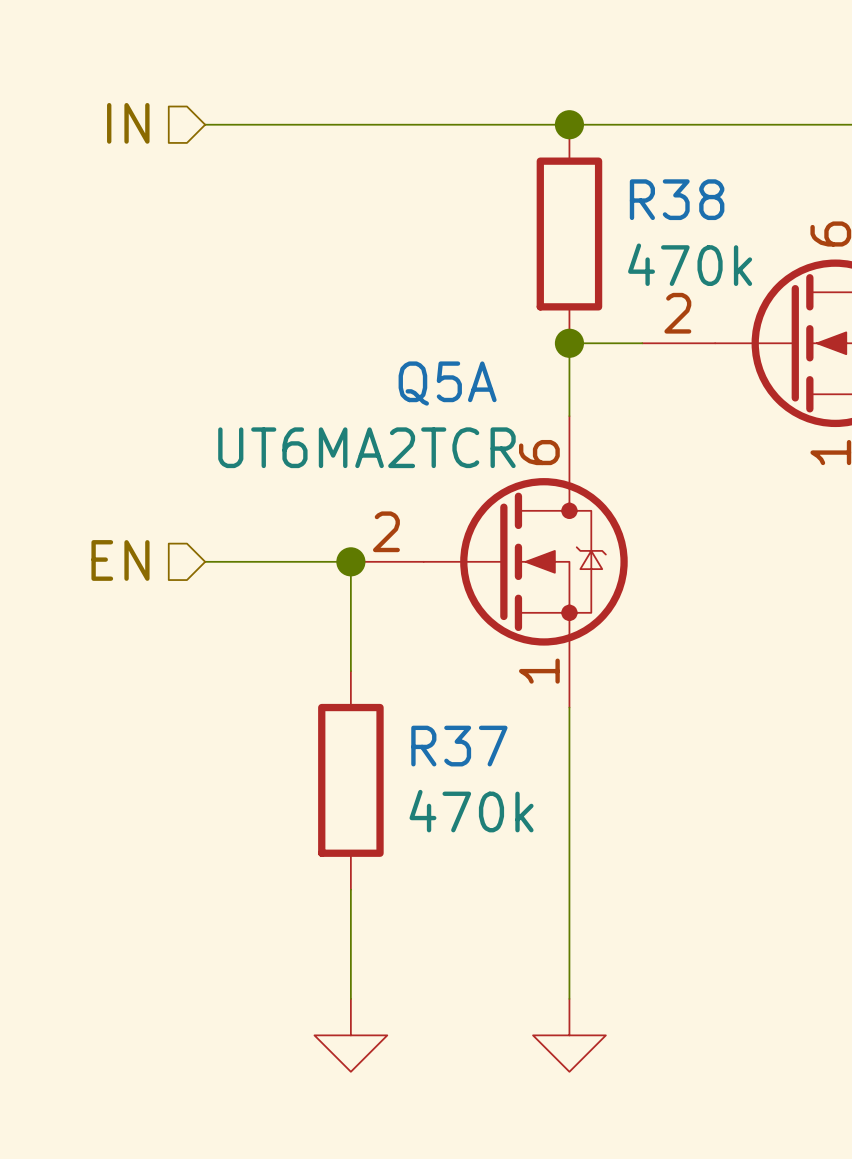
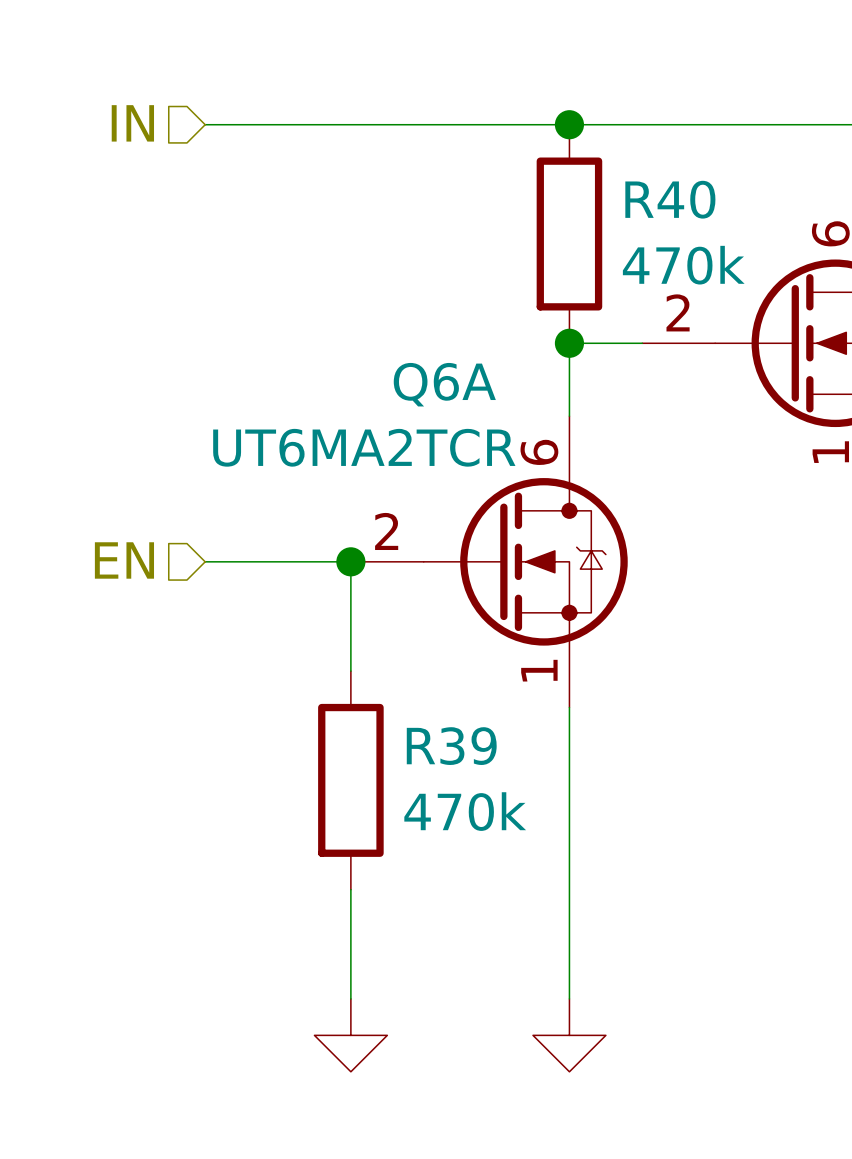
R38 name: R38 (677, 199) -> R40 (670, 199)
Q5A name: Q5A (447, 383) -> Q6A (444, 384)
R37 name: R37 (459, 746) -> R39 (451, 746)

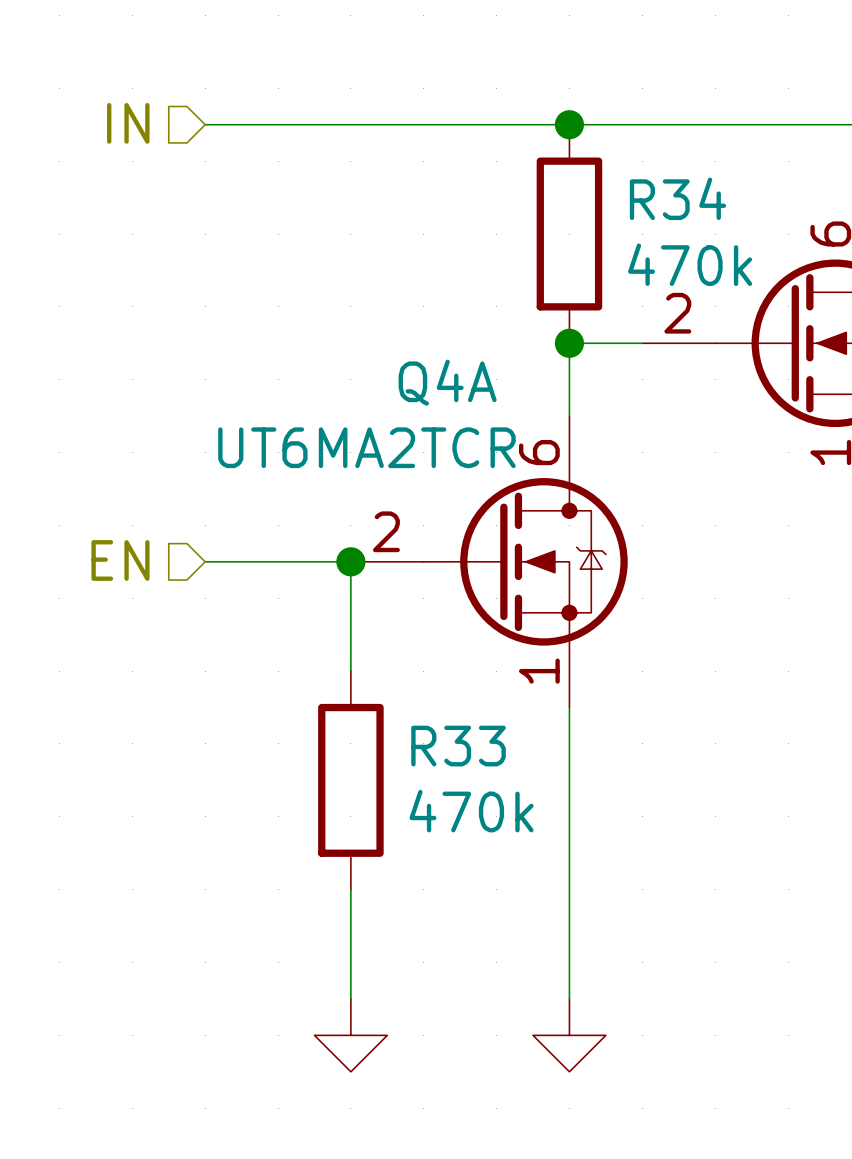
R40 name: R40 (670, 199) -> R34 (677, 198)
Q6A name: Q6A (444, 384) -> Q4A (447, 382)
R39 name: R39 (451, 746) -> R33 (458, 746)

